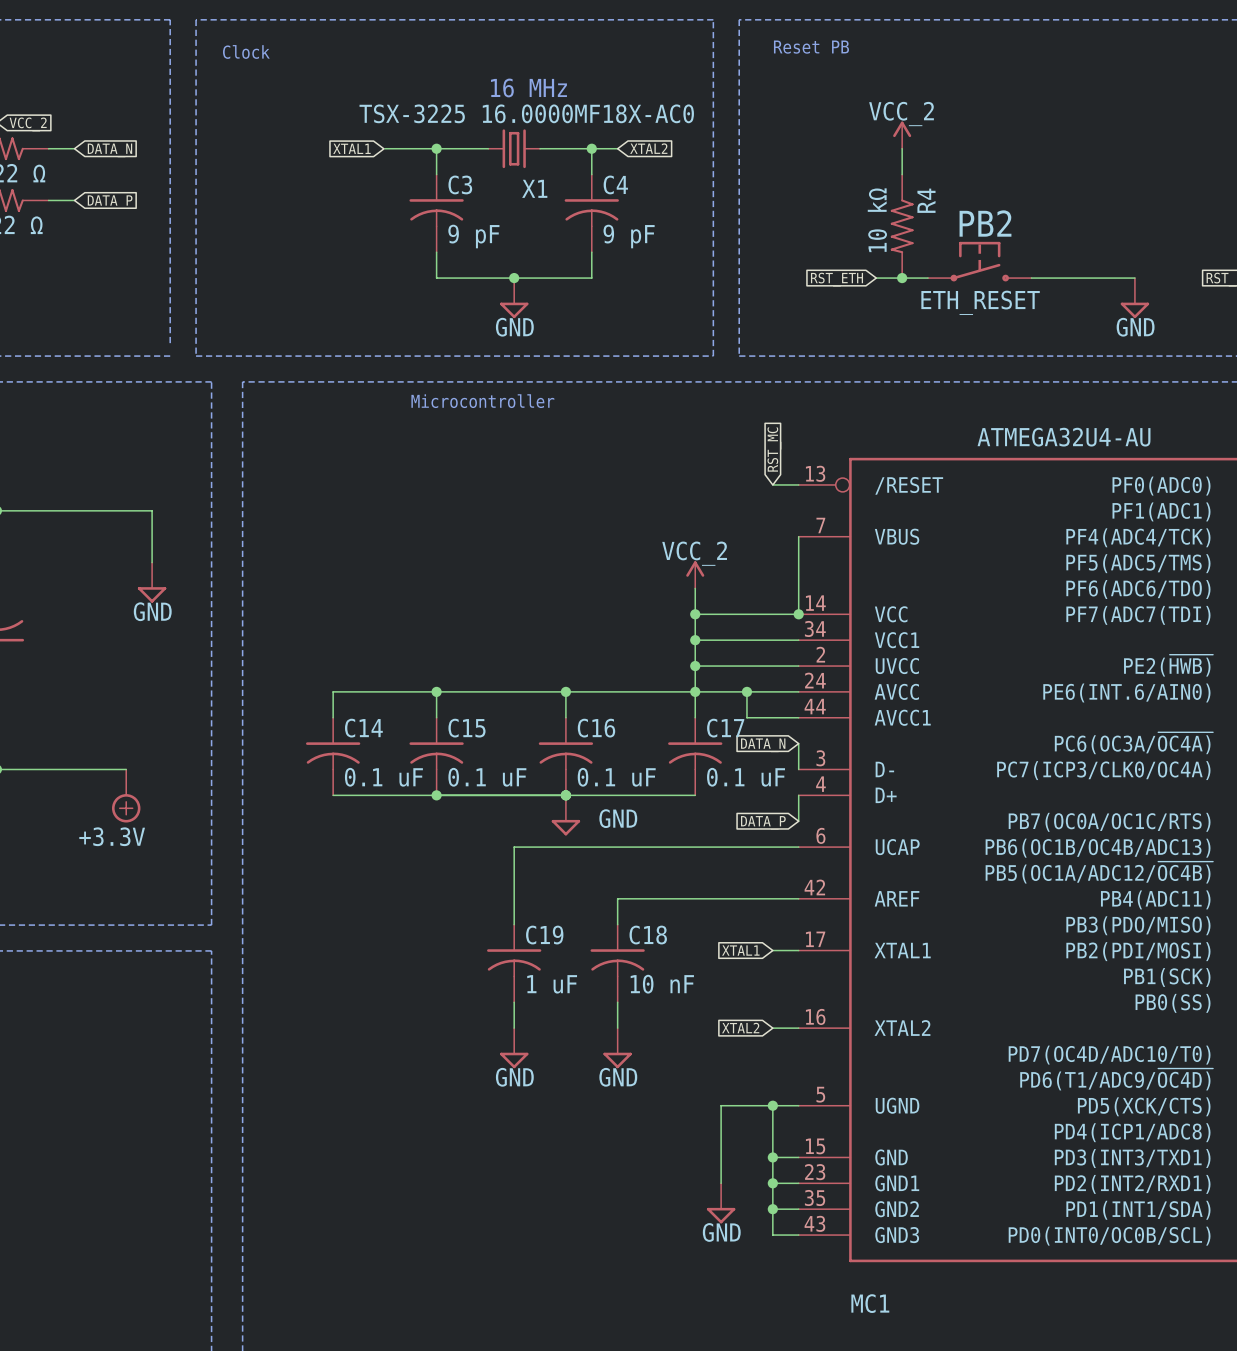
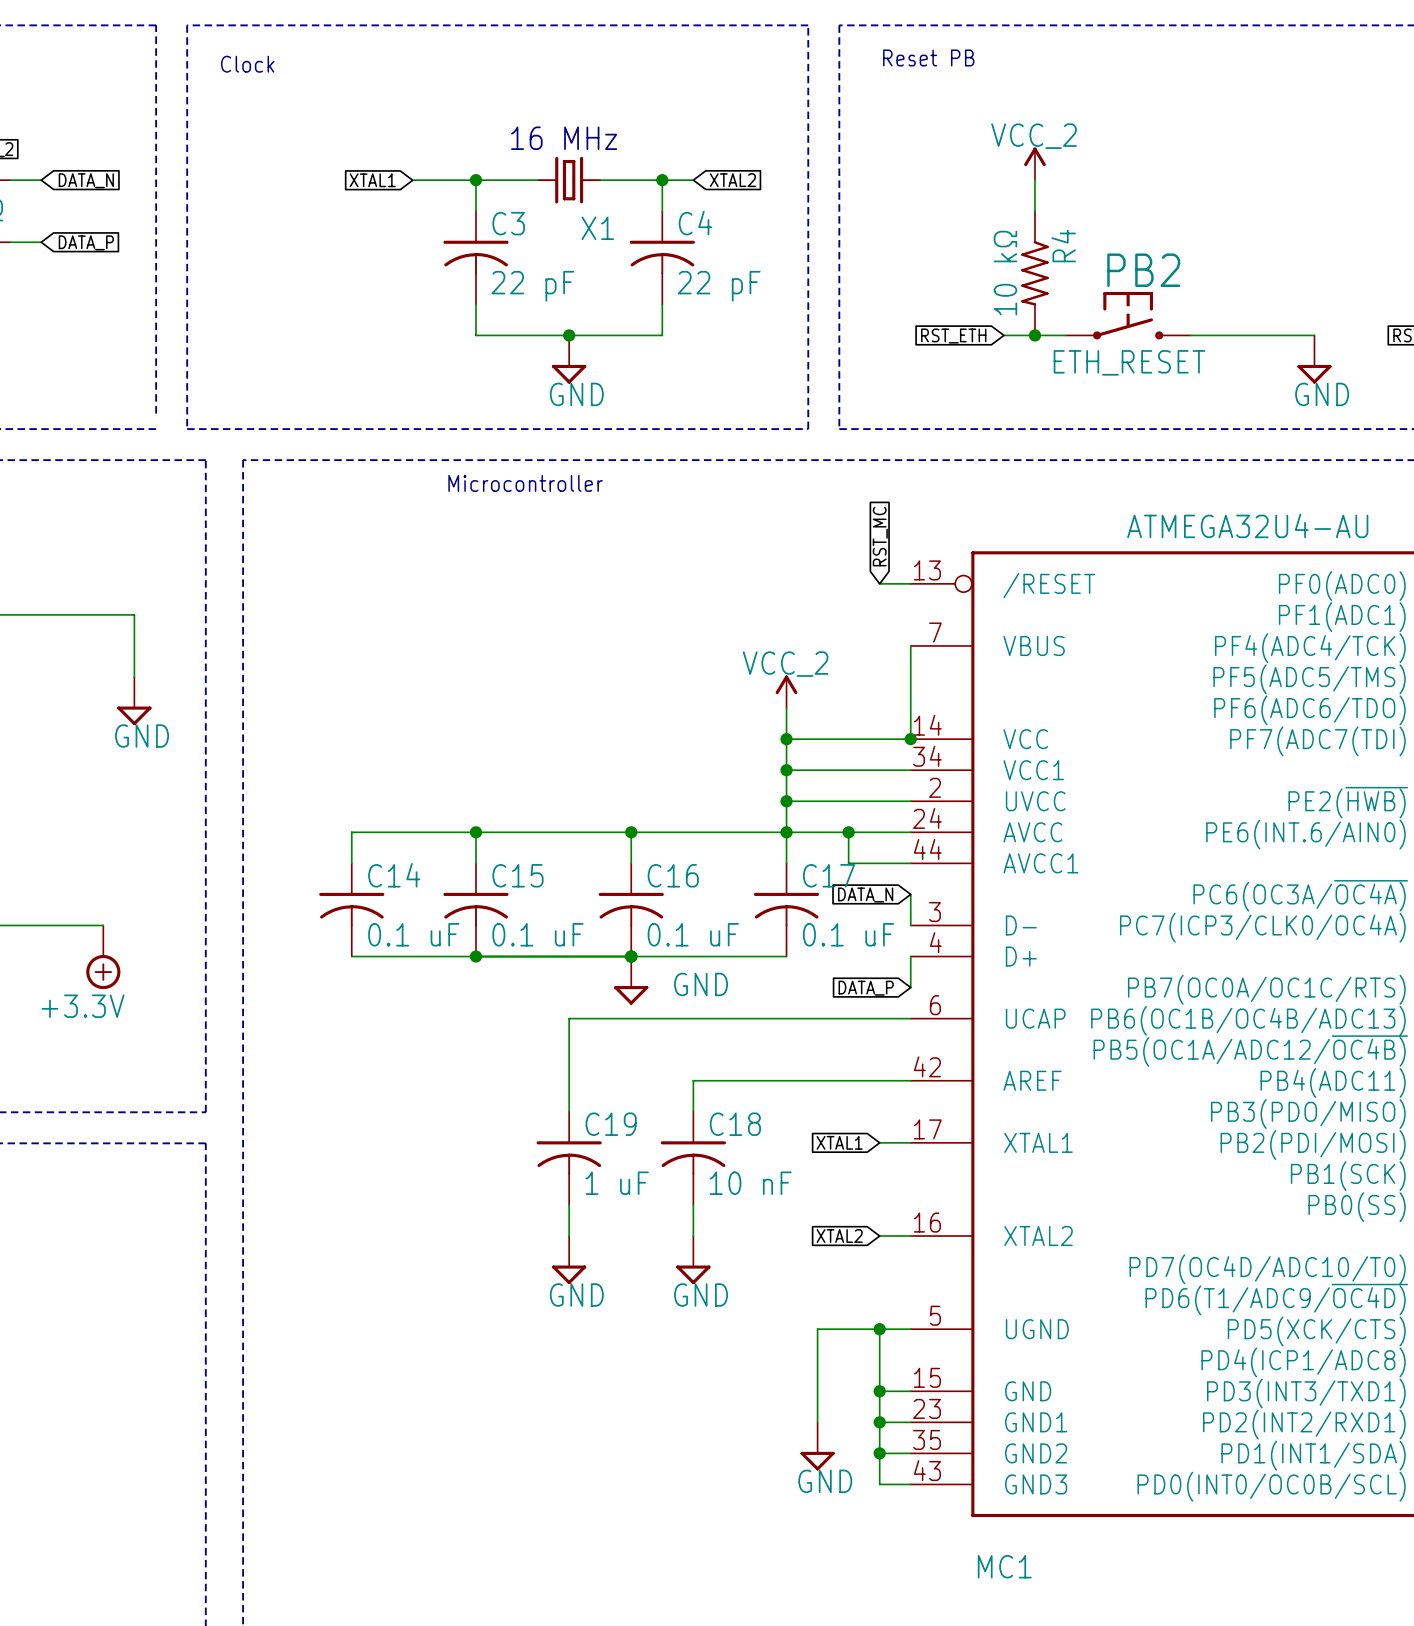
text position: 16 MHz (528, 87) -> 16 MHz (564, 138)
X1 value: TSX-3225 16.0000MF18X-AC0 (526, 113) -> none
C3 value: 9 pF (473, 236) -> 22 pF (532, 286)
C4 value: 9 pF (629, 236) -> 22 pF (719, 286)

